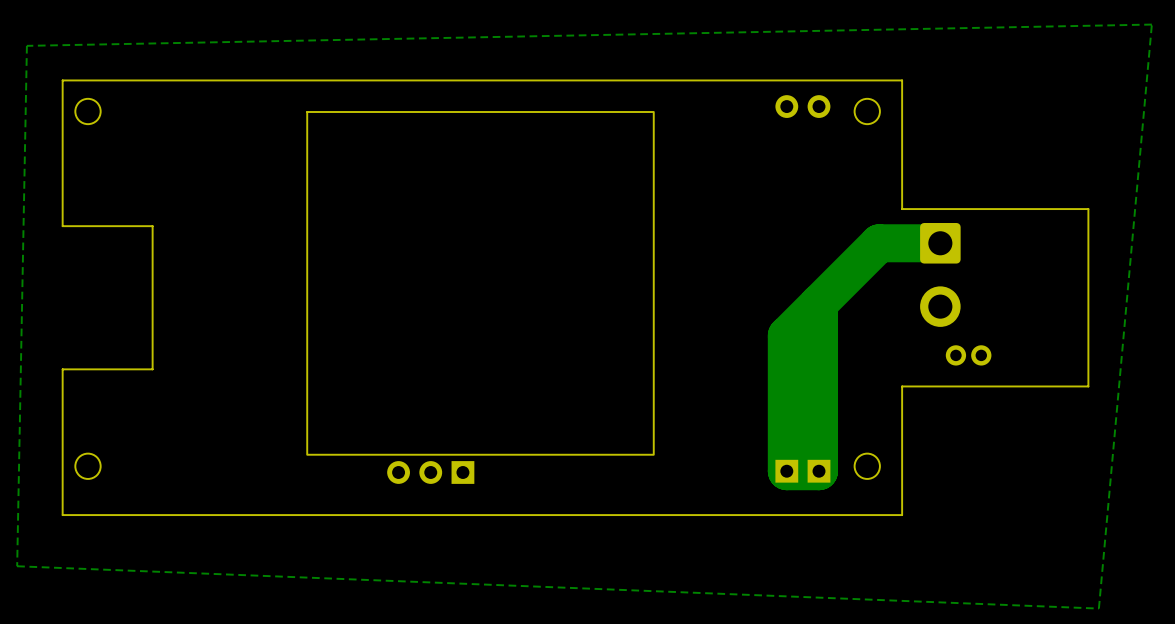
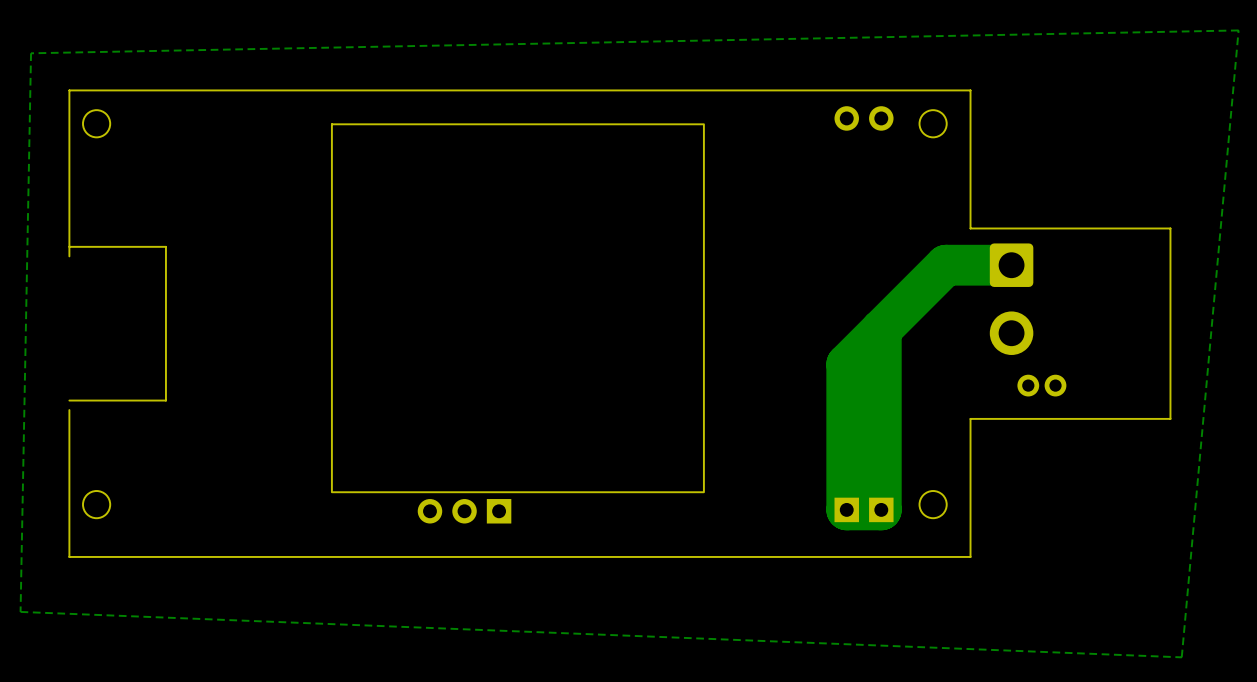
board edge: (62, 369) (62, 378) -> (69, 246) (69, 256)

